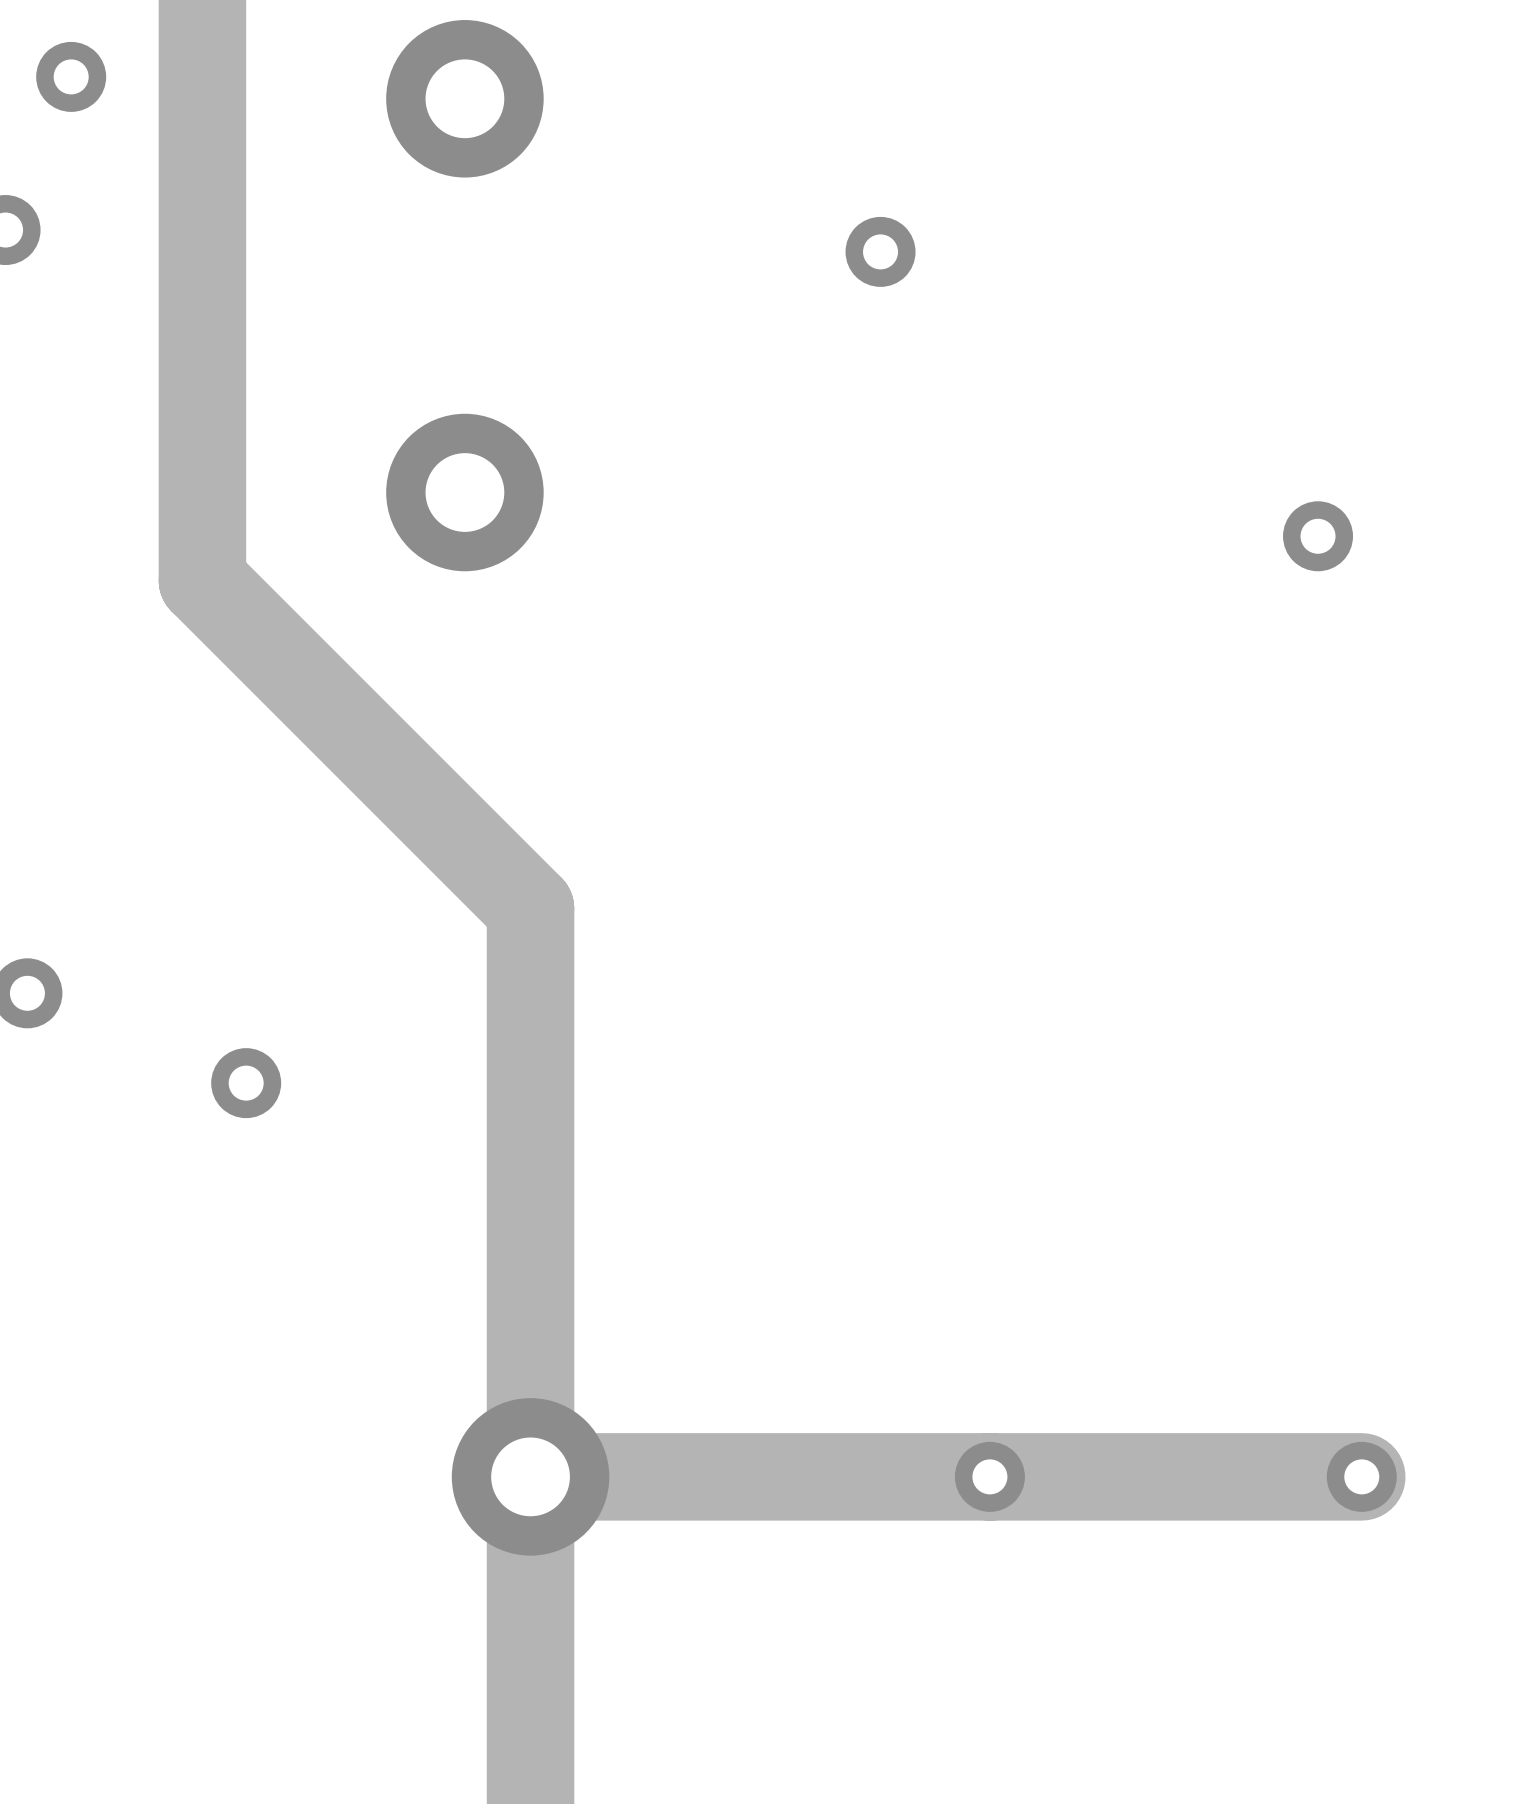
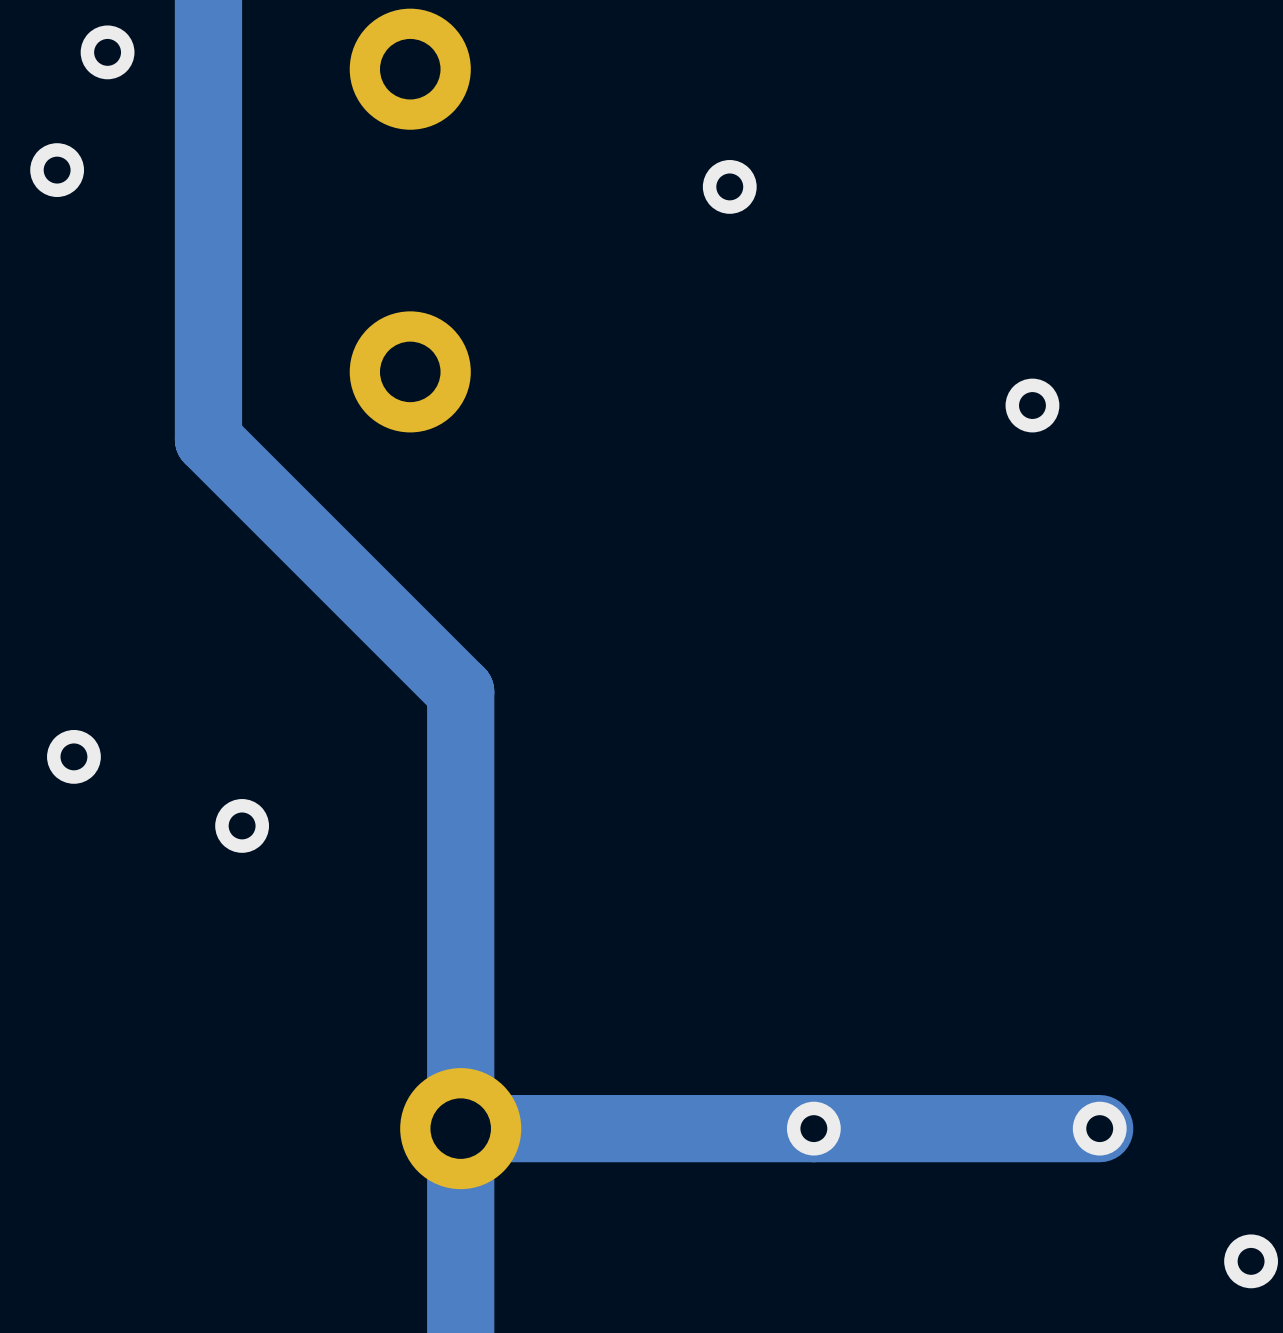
via position: (1318, 536) -> (1032, 405)

